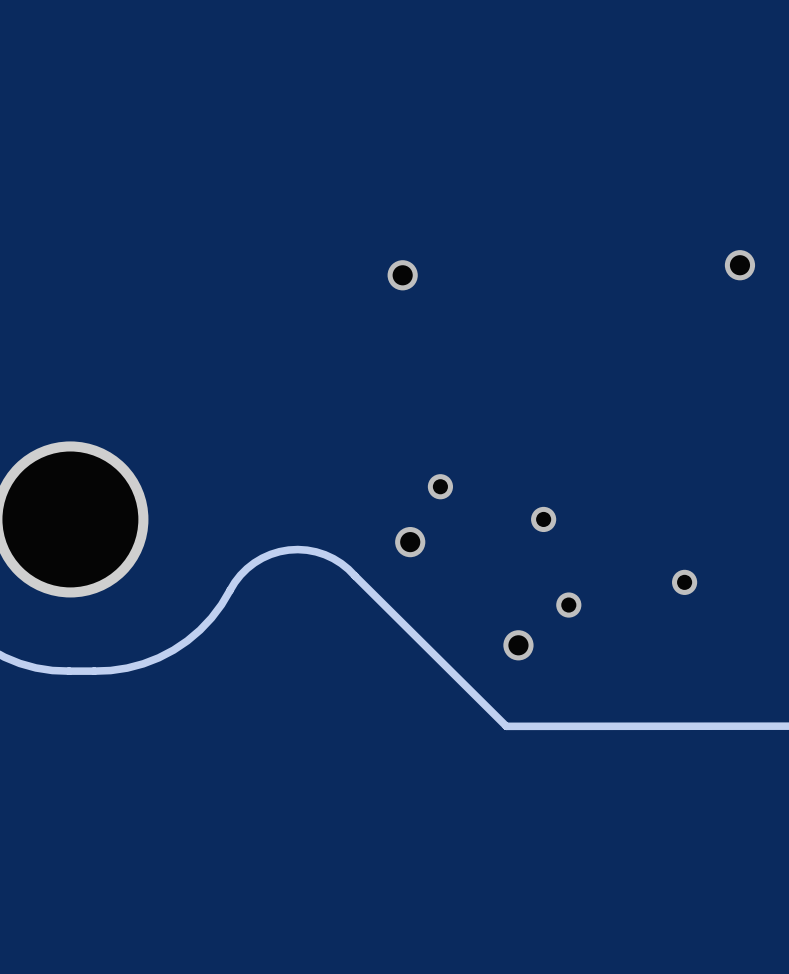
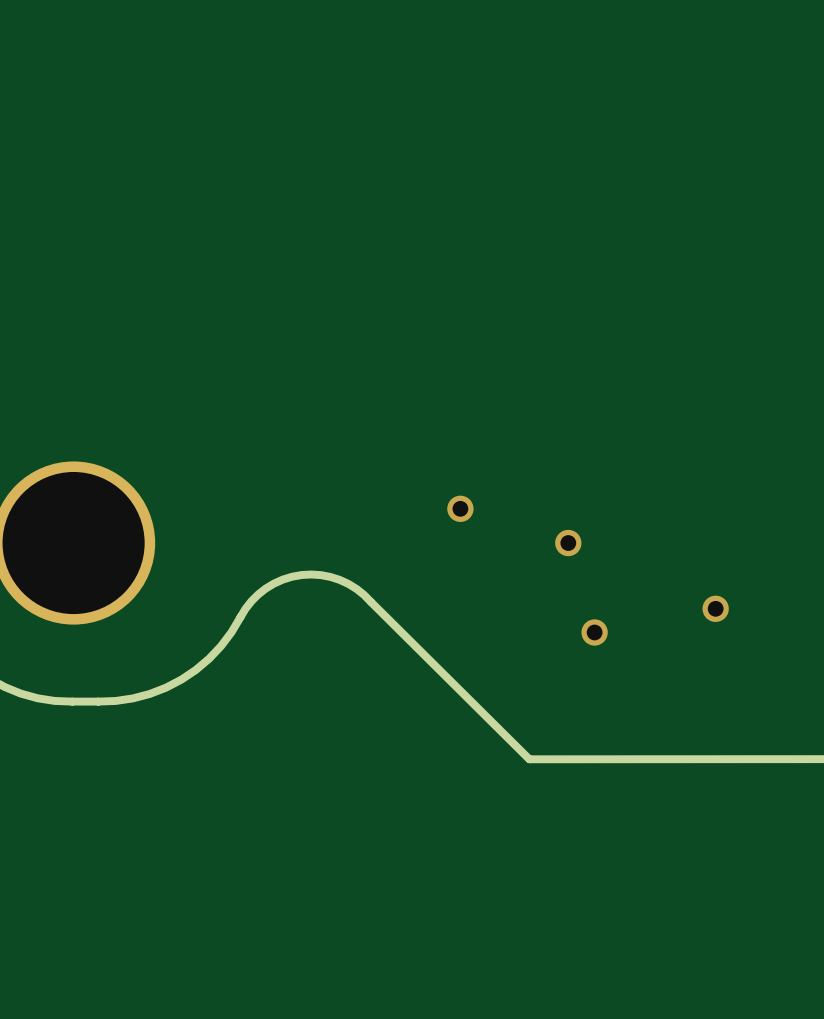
via: (739, 265) -> none
via: (402, 275) -> none
via: (410, 542) -> none
via: (518, 645) -> none

